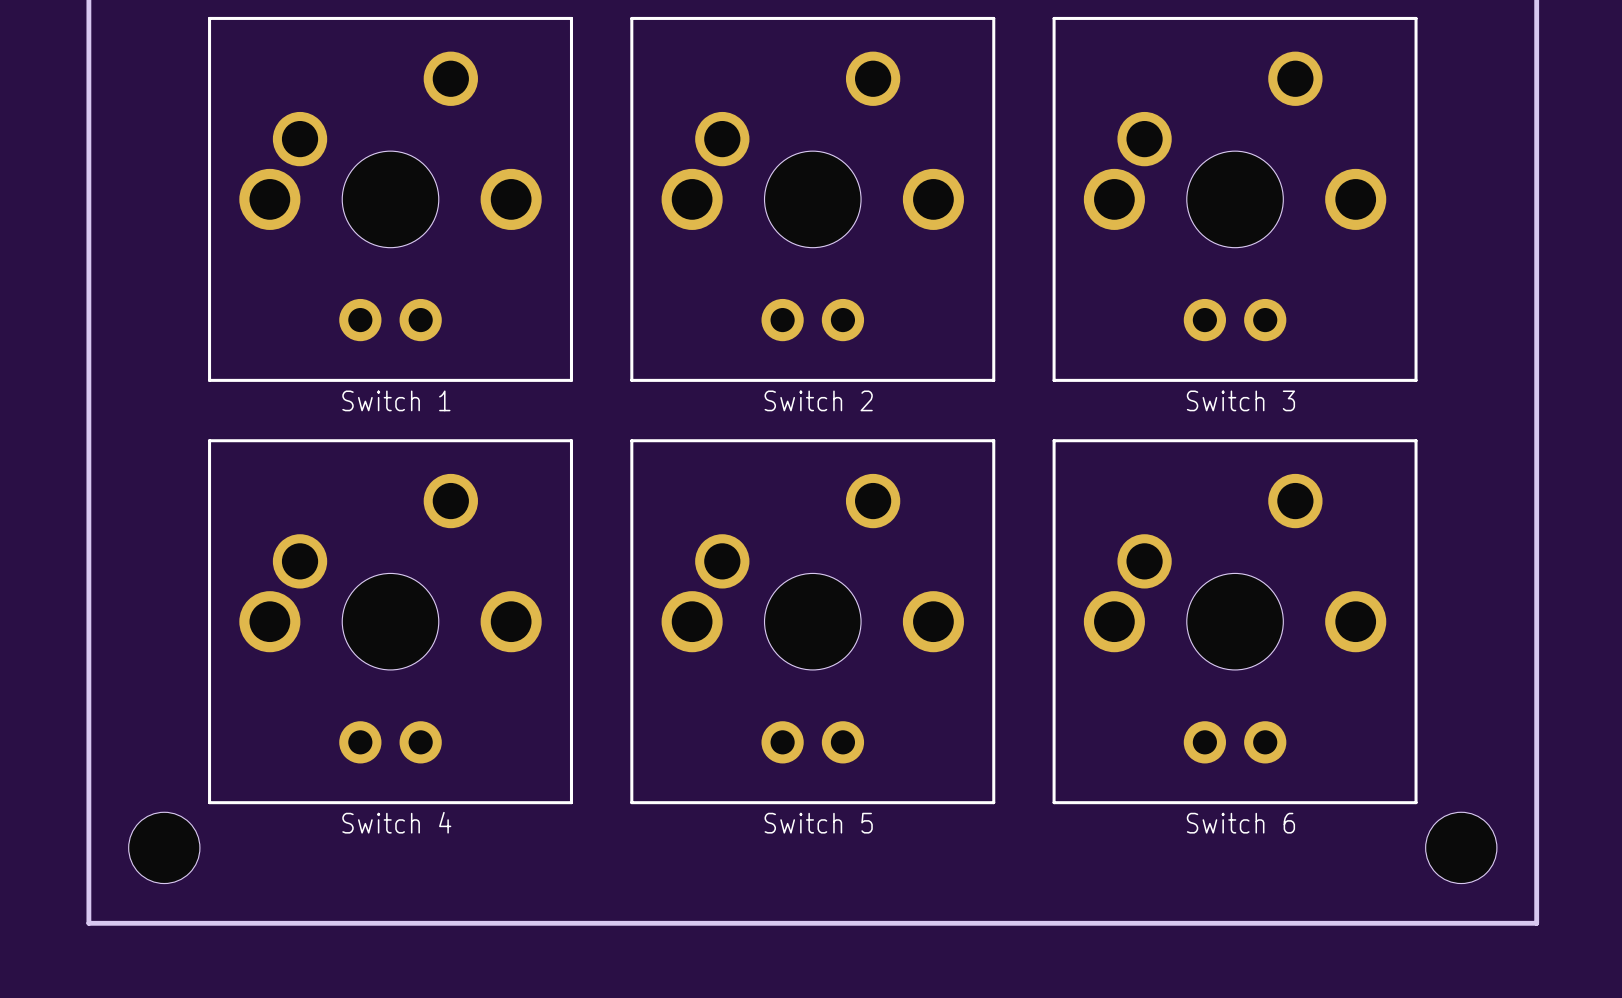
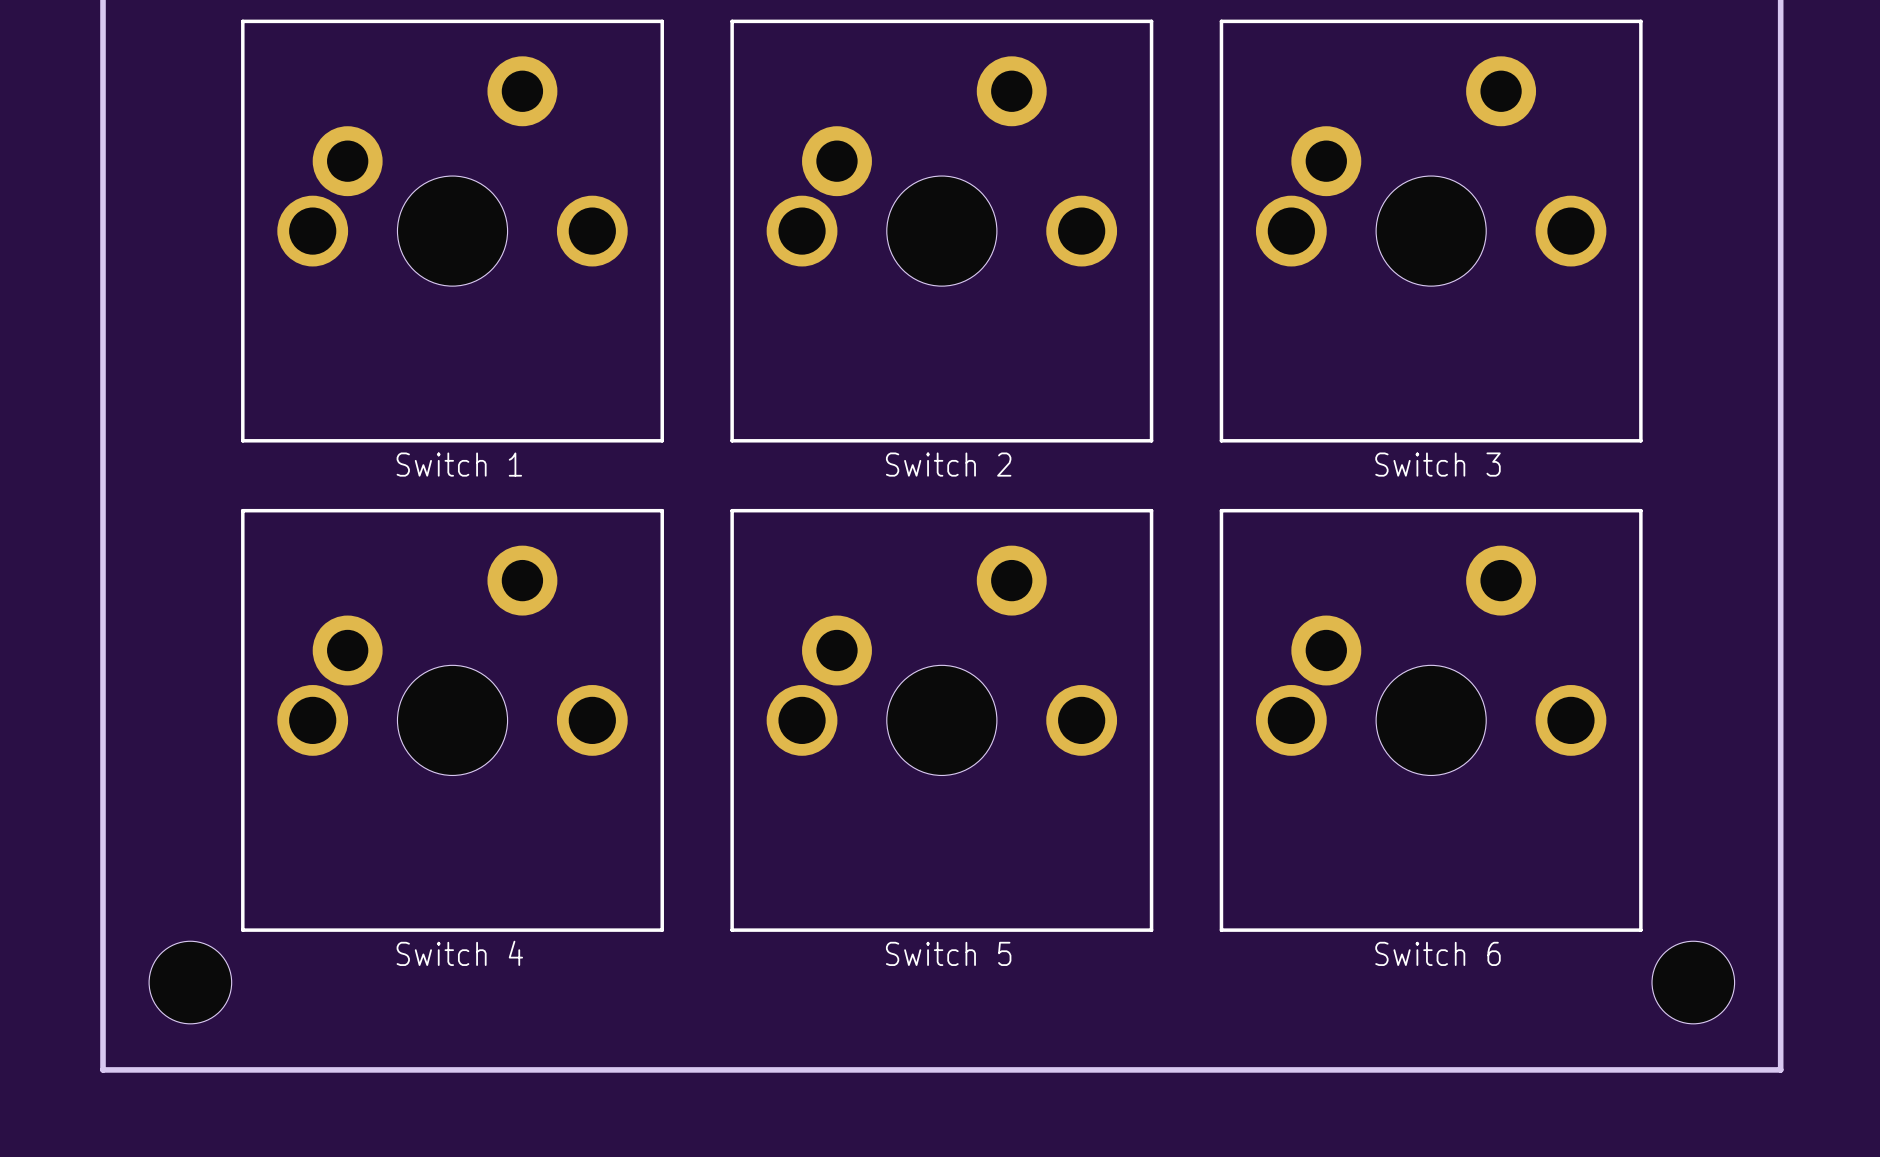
part footprint: [208, 16, 573, 382] -> [241, 19, 664, 443]
part footprint: [630, 16, 996, 382] -> [730, 19, 1154, 443]
part footprint: [1052, 16, 1418, 382] -> [1219, 19, 1643, 443]
part footprint: [208, 439, 573, 805] -> [241, 508, 664, 932]
part footprint: [630, 439, 996, 805] -> [730, 508, 1154, 932]
part footprint: [1052, 439, 1418, 805] -> [1219, 508, 1643, 932]

